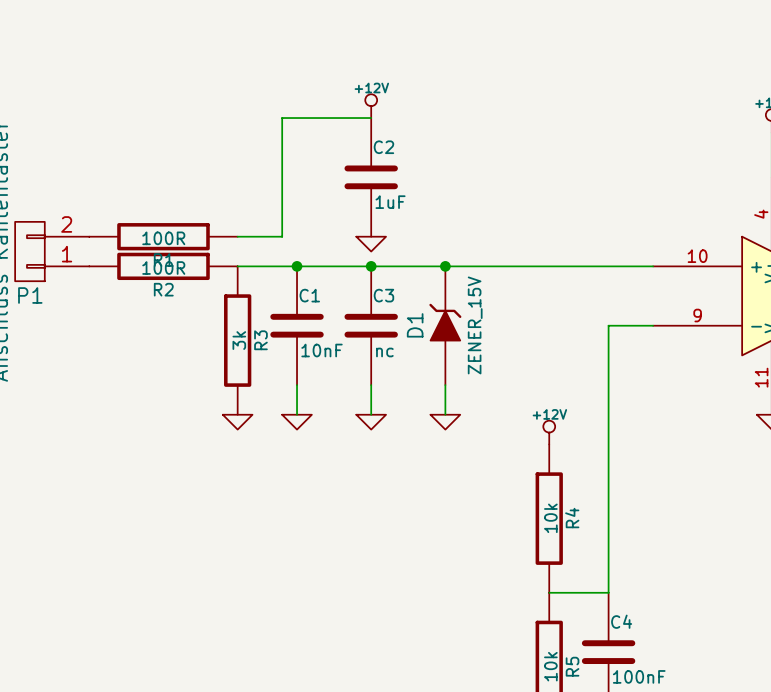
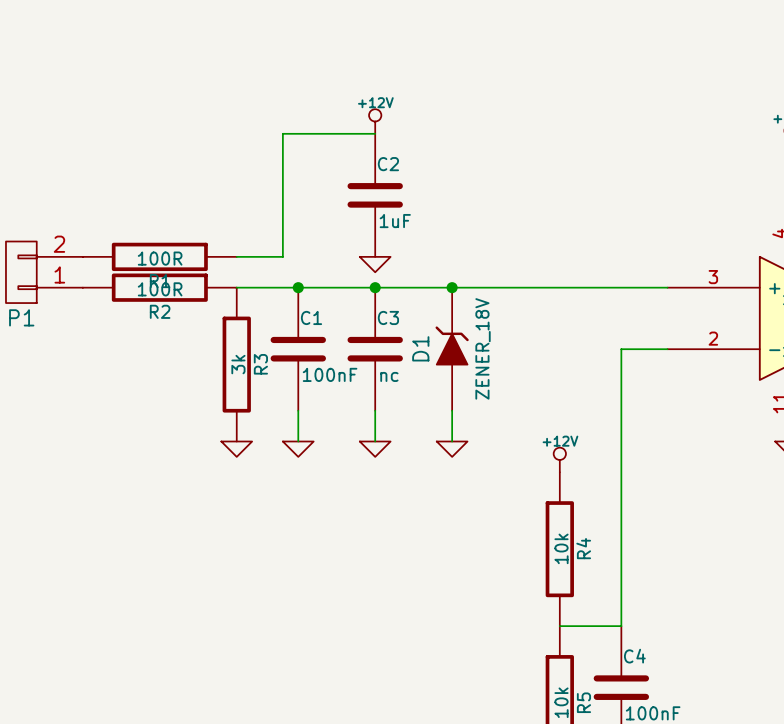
part pin number: 10 (697, 256) -> 3 (713, 277)
part pin number: 9 (697, 315) -> 2 (713, 338)
D1 value: ZENER_15V (475, 325) -> ZENER_18V (483, 348)
C1 value: 10nF (322, 350) -> 100nF (330, 374)

